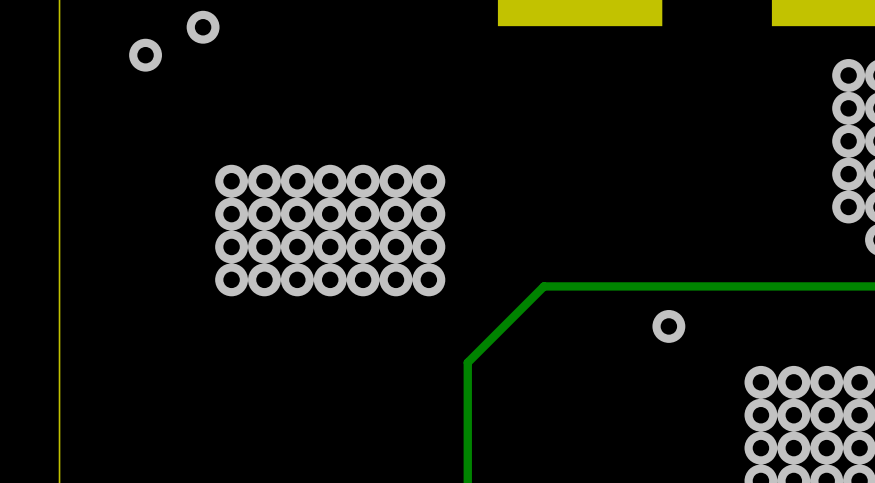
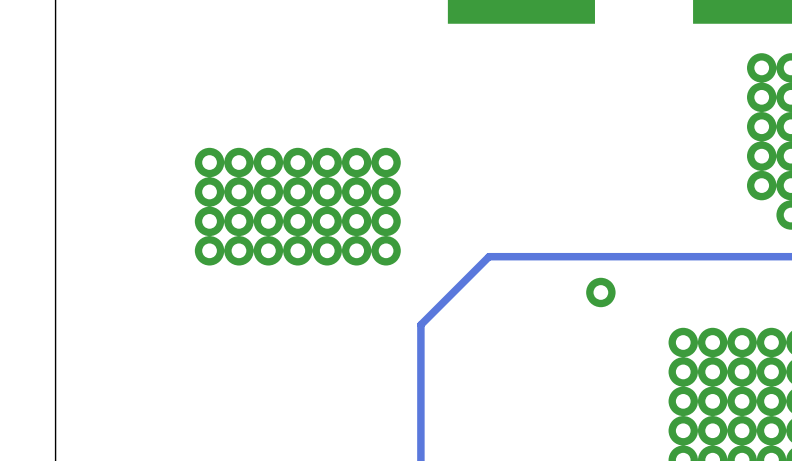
via: (203, 27) -> none
via: (145, 55) -> none

